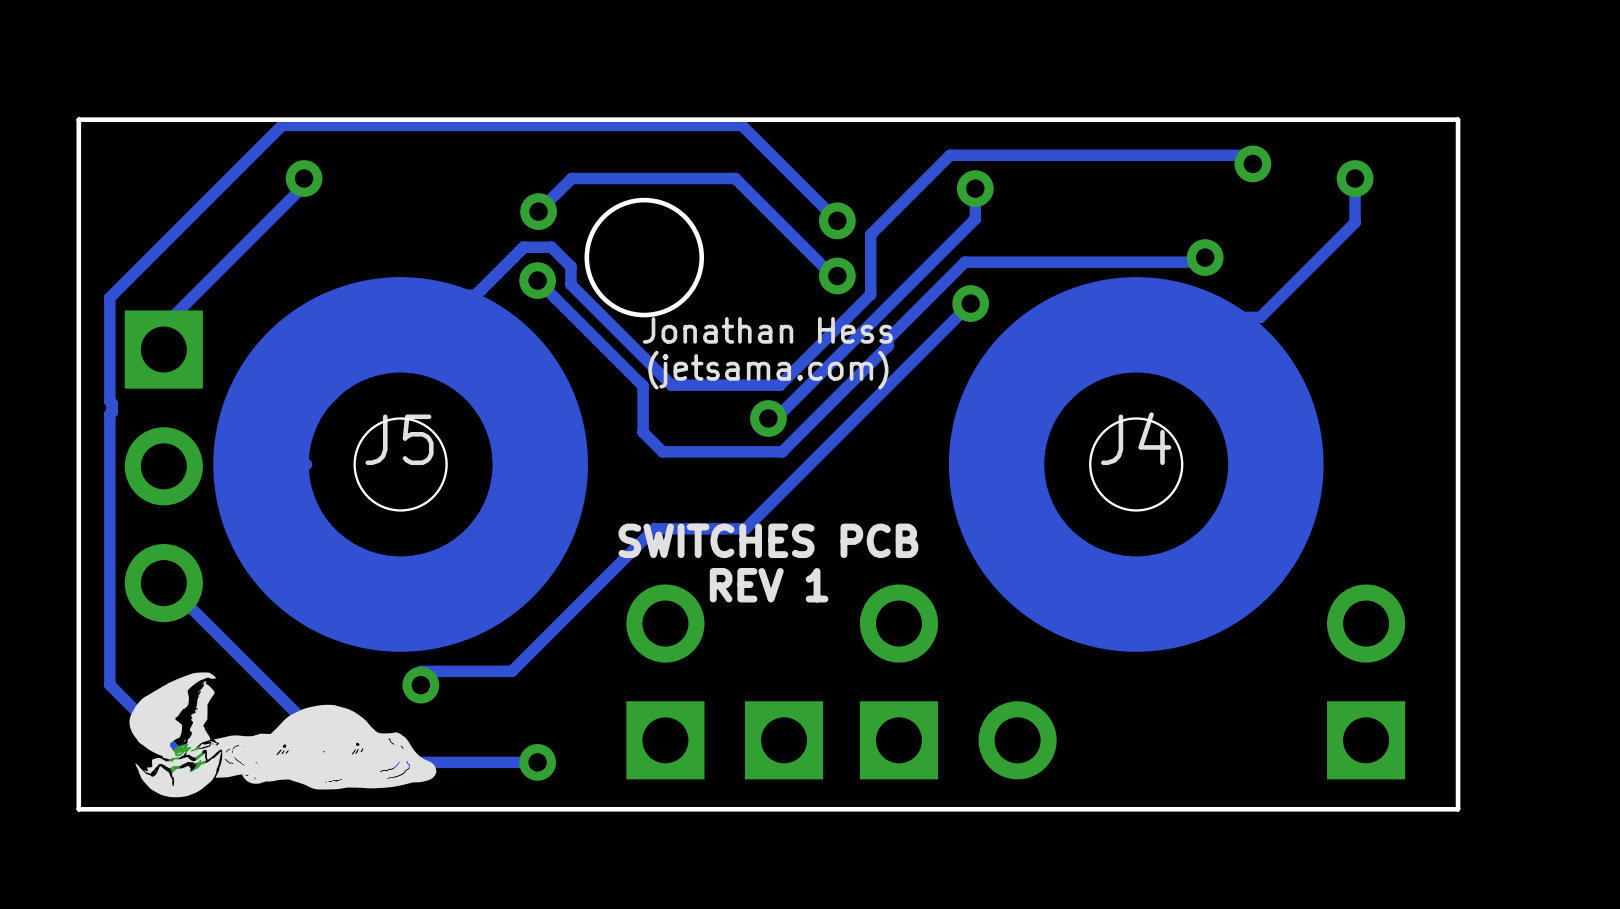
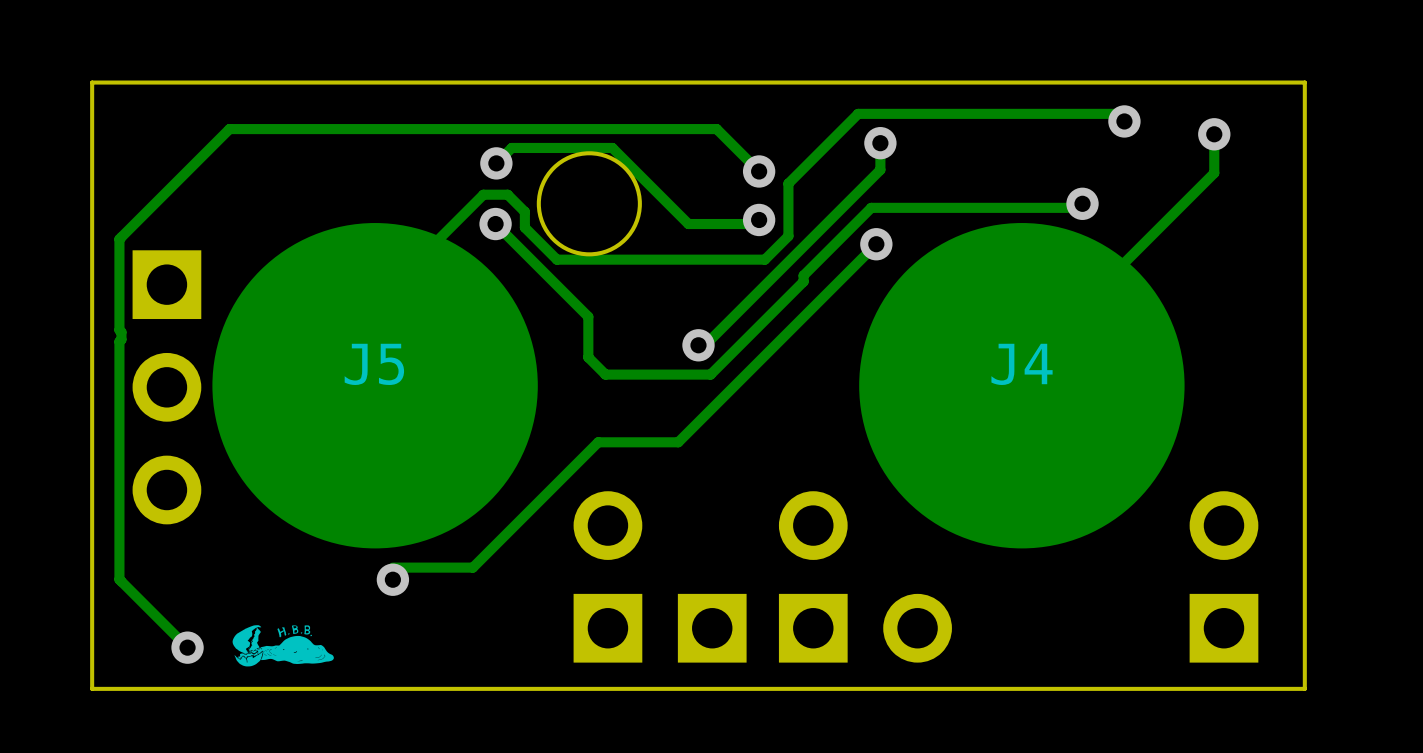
track: (789, 172) (741, 125) (282, 125) (235, 172) -> (716, 129) (229, 129)
via: (304, 178) -> none
track: (307, 183) (163, 325) (163, 349) -> none
track: (556, 194) (571, 178) (735, 178) (837, 280) -> (511, 147) (612, 147) (688, 224) (759, 224)
J5 footprint: [213, 277, 588, 652] -> [212, 223, 538, 549]
J4 footprint: [948, 277, 1324, 652] -> [859, 223, 1185, 549]
track: (843, 321) (779, 385) (671, 385) (607, 321) -> (764, 259) (556, 259)
text: Jonathan Hess (767, 330) -> none
text: (jetsama.com) (768, 370) -> none
text: SWITCHES PCB (768, 540) -> none
track: (166, 583) (345, 762) (537, 762) -> none
text: REV 1 (769, 585) -> none
drawing: [129, 672, 437, 798] -> none
via: (537, 762) -> none

